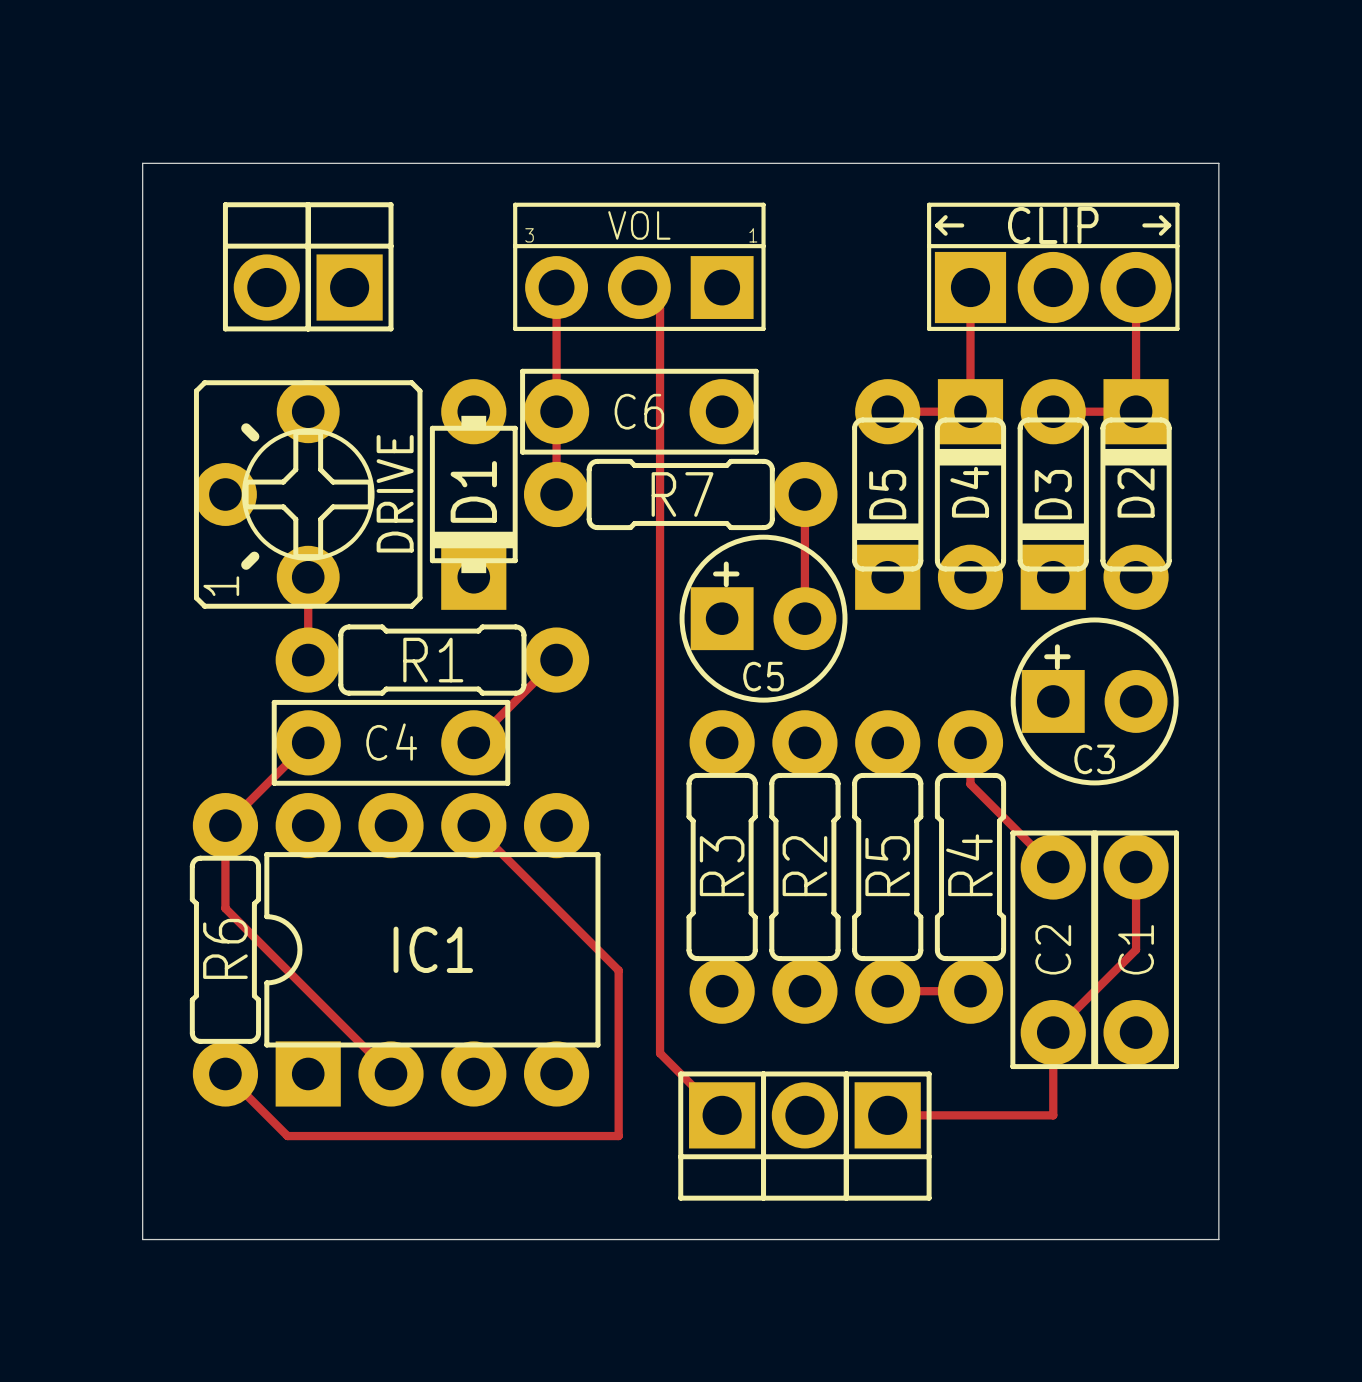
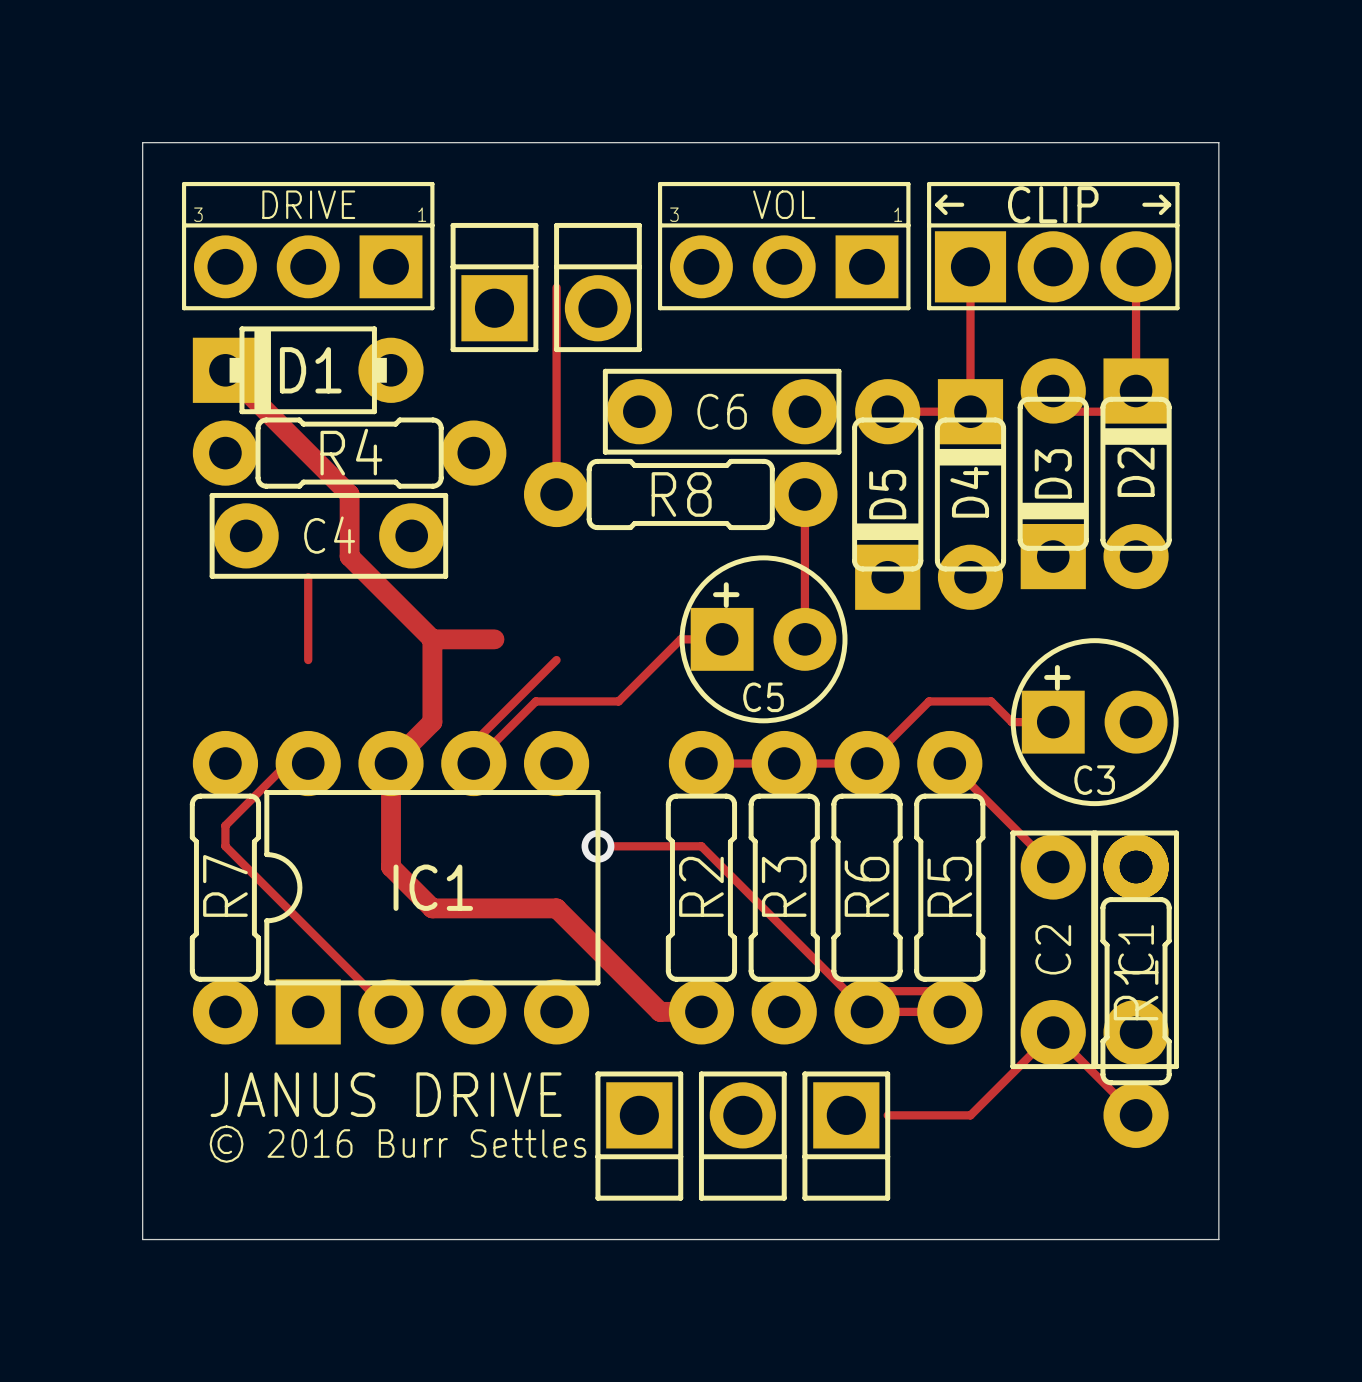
board edge: (142, 163) (1218, 163) -> (142, 163) (142, 142) (1218, 142) (1218, 163)
DRIVE: none -> (308, 246)
part position: (266, 266) -> (597, 287)
part position: (349, 266) -> (494, 287)
VOL position: (639, 266) -> (784, 246)
CLIP position: (1053, 266) -> (1053, 246)
track: (639, 287) (660, 308) (660, 1053) (722, 1115) -> none
track: none -> (225, 370) (349, 494) (349, 556) (432, 639)
C6 position: (639, 411) -> (722, 411)
DRIVE: (308, 494) -> none
D1 rotation: 0° (473, 494) -> 90° clockwise (308, 370)
D1 position: (473, 494) -> (308, 370)
R7 name: R7 (682, 494) -> R8 (681, 494)
D3 position: (1053, 494) -> (1053, 473)
D2 position: (1136, 494) -> (1136, 473)
C5 position: (763, 618) -> (763, 639)
track: none -> (432, 639) (494, 639)
track: none -> (722, 639) (680, 639) (618, 701) (535, 701) (473, 763)
R1 rotation: 0° (432, 660) -> 90° clockwise (1136, 991)
R1 position: (432, 660) -> (1136, 991)
C3 position: (1094, 701) -> (1094, 722)
track: none -> (1053, 722) (1011, 722) (991, 701) (929, 701) (867, 763) (701, 763)
C4 position: (391, 742) -> (328, 535)
track: (473, 825) (556, 908) -> (432, 639) (432, 722) (391, 763) (391, 867) (432, 908) (556, 908)
track: (225, 846) (225, 908) (391, 1073) -> (225, 846) (391, 1011)
track: none -> (597, 846) (701, 846) (867, 1011) (949, 1011)
via: none -> (597, 846)
R3 position: (722, 867) -> (784, 887)
R2 position: (804, 867) -> (701, 887)
R5 position: (887, 867) -> (949, 887)
R4 rotation: 0° (970, 867) -> 90° clockwise (349, 453)
R4 position: (970, 867) -> (349, 453)
track: (1136, 867) (1136, 949) (1053, 1032) (1053, 1115) (970, 1115) -> (1136, 1115) (1053, 1032) (970, 1115)
R7: none -> (225, 887)
track width: thin (556, 908) (618, 970) -> thick (556, 908) (618, 970)
R6 position: (225, 949) -> (867, 887)
IC1 position: (432, 949) -> (432, 887)
track: (618, 970) (618, 1136) (287, 1136) (225, 1073) -> (618, 970) (660, 1011) (701, 1011)
part footprint: [678, 1071, 767, 1201] -> [698, 1071, 787, 1201]
text: none -> JANUS DRIVE (386, 1094)
part: none -> (639, 1136)
part: (804, 1136) -> none
part position: (887, 1136) -> (846, 1136)
text: none -> © 2016 Burr Settles (398, 1144)

